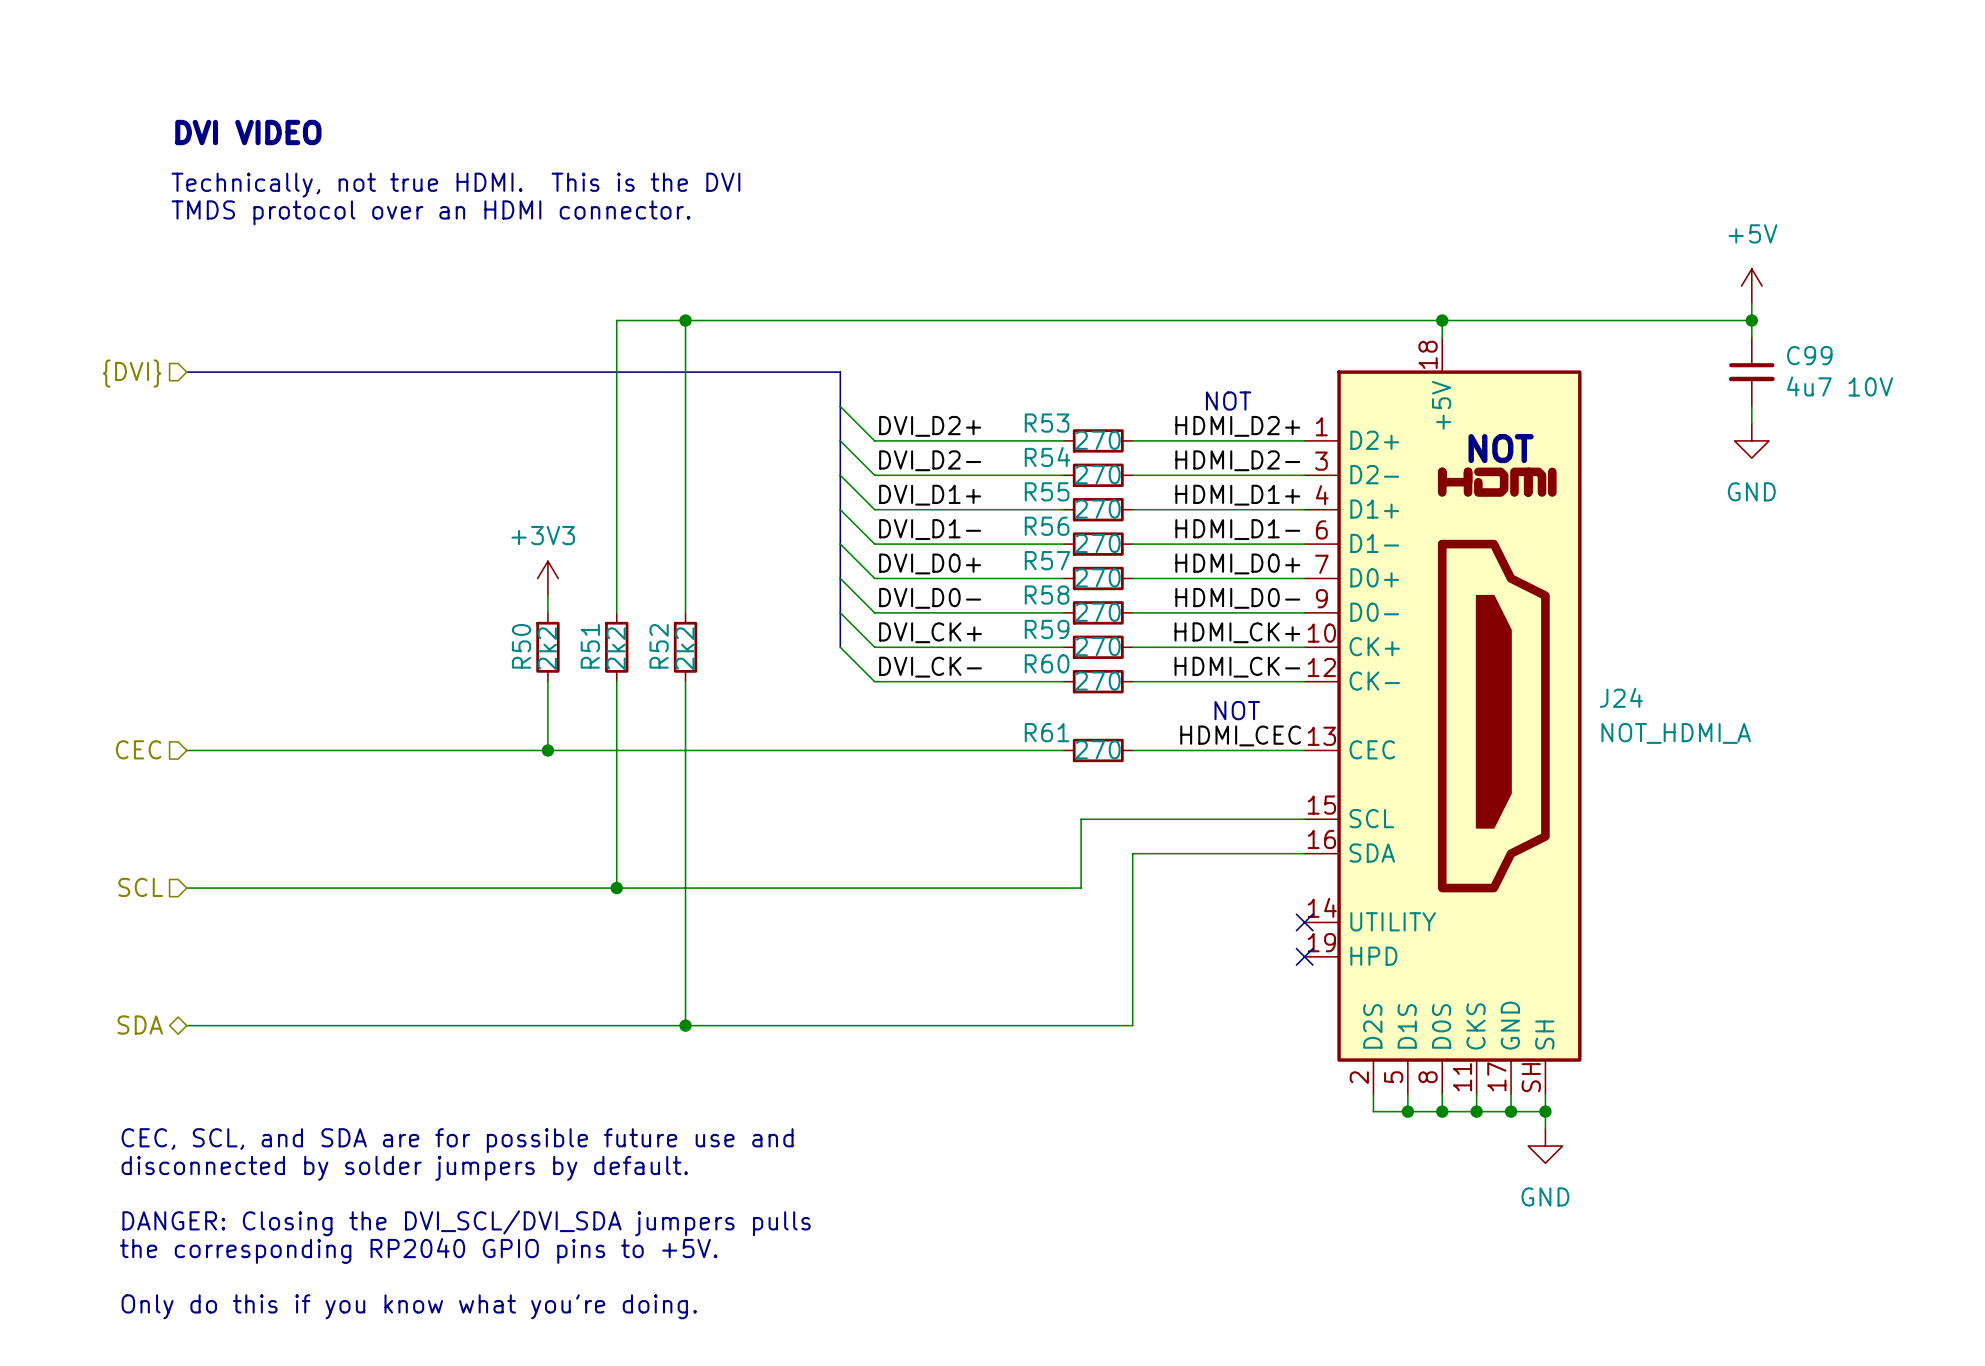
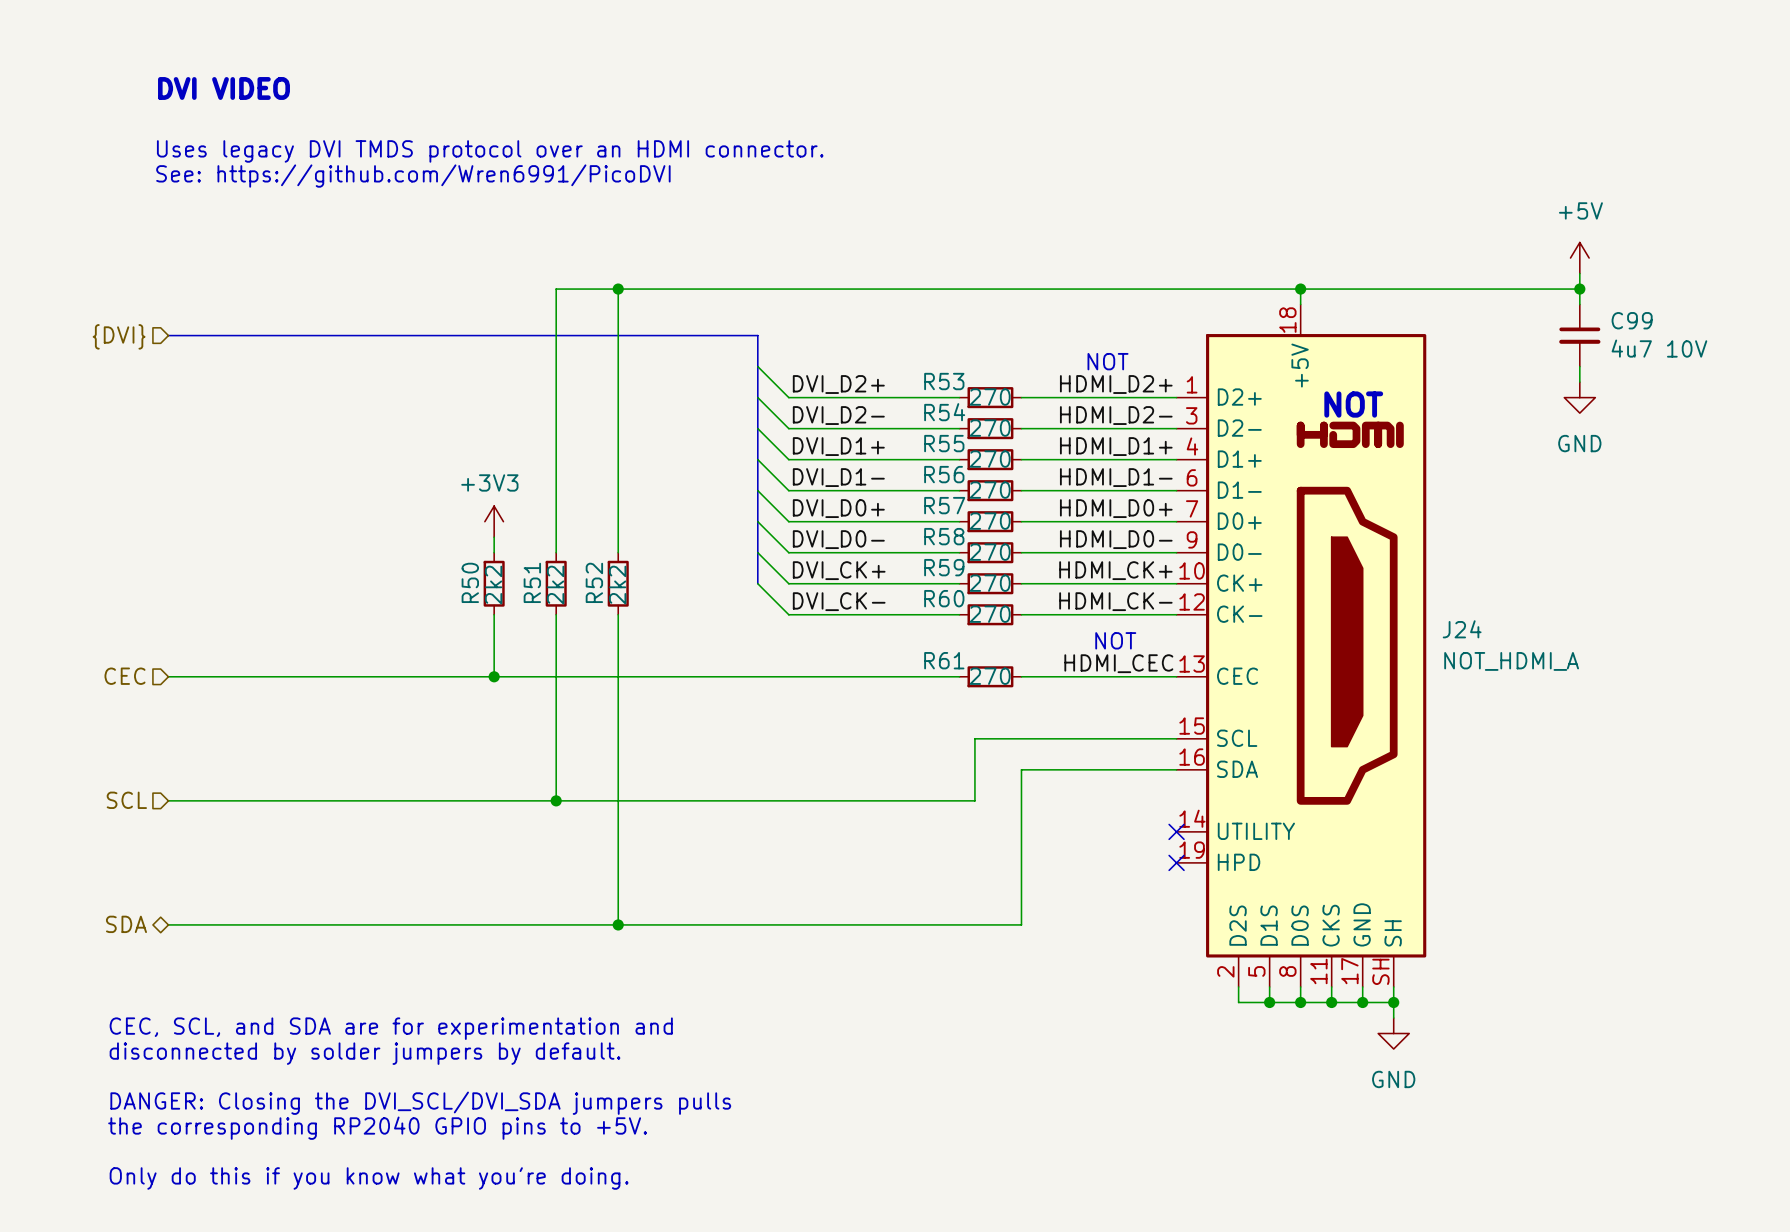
text position: DVI VIDEO (248, 132) -> DVI VIDEO (223, 88)
text: none -> Uses legacy DVI TMDS protocol over an HDMI connector. (490, 151)
text: Technically, not true HDMI. This is the DVI (455, 185) -> none
text: none -> See: https://github.com/Wren6991/PicoDVI (413, 176)
text: TMDS protocol over an HDMI connector. (430, 212) -> none
text: CEC, SCL, and SDA are for possible future use and (457, 1140) -> CEC, SCL, and SDA are for experimentation and (391, 1028)

